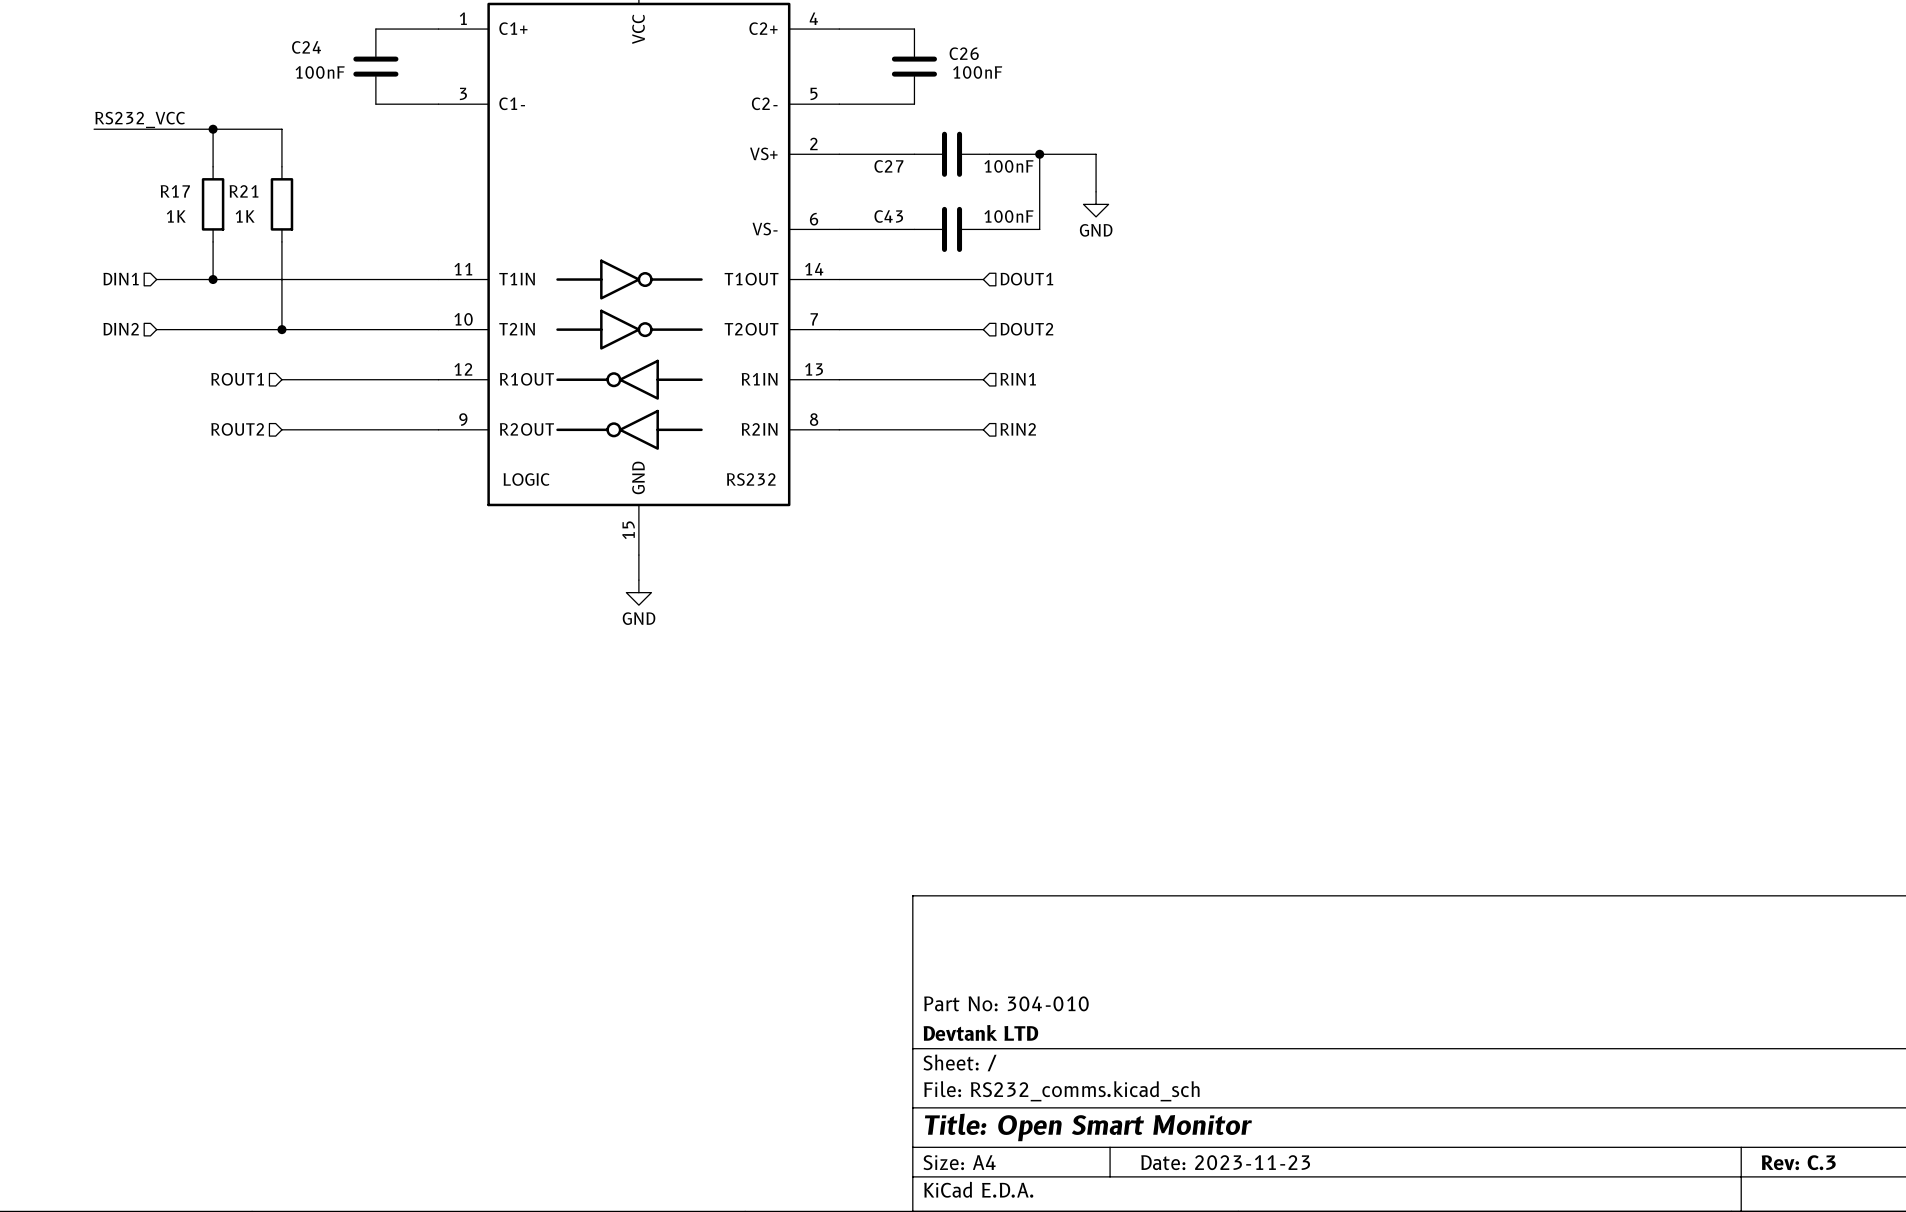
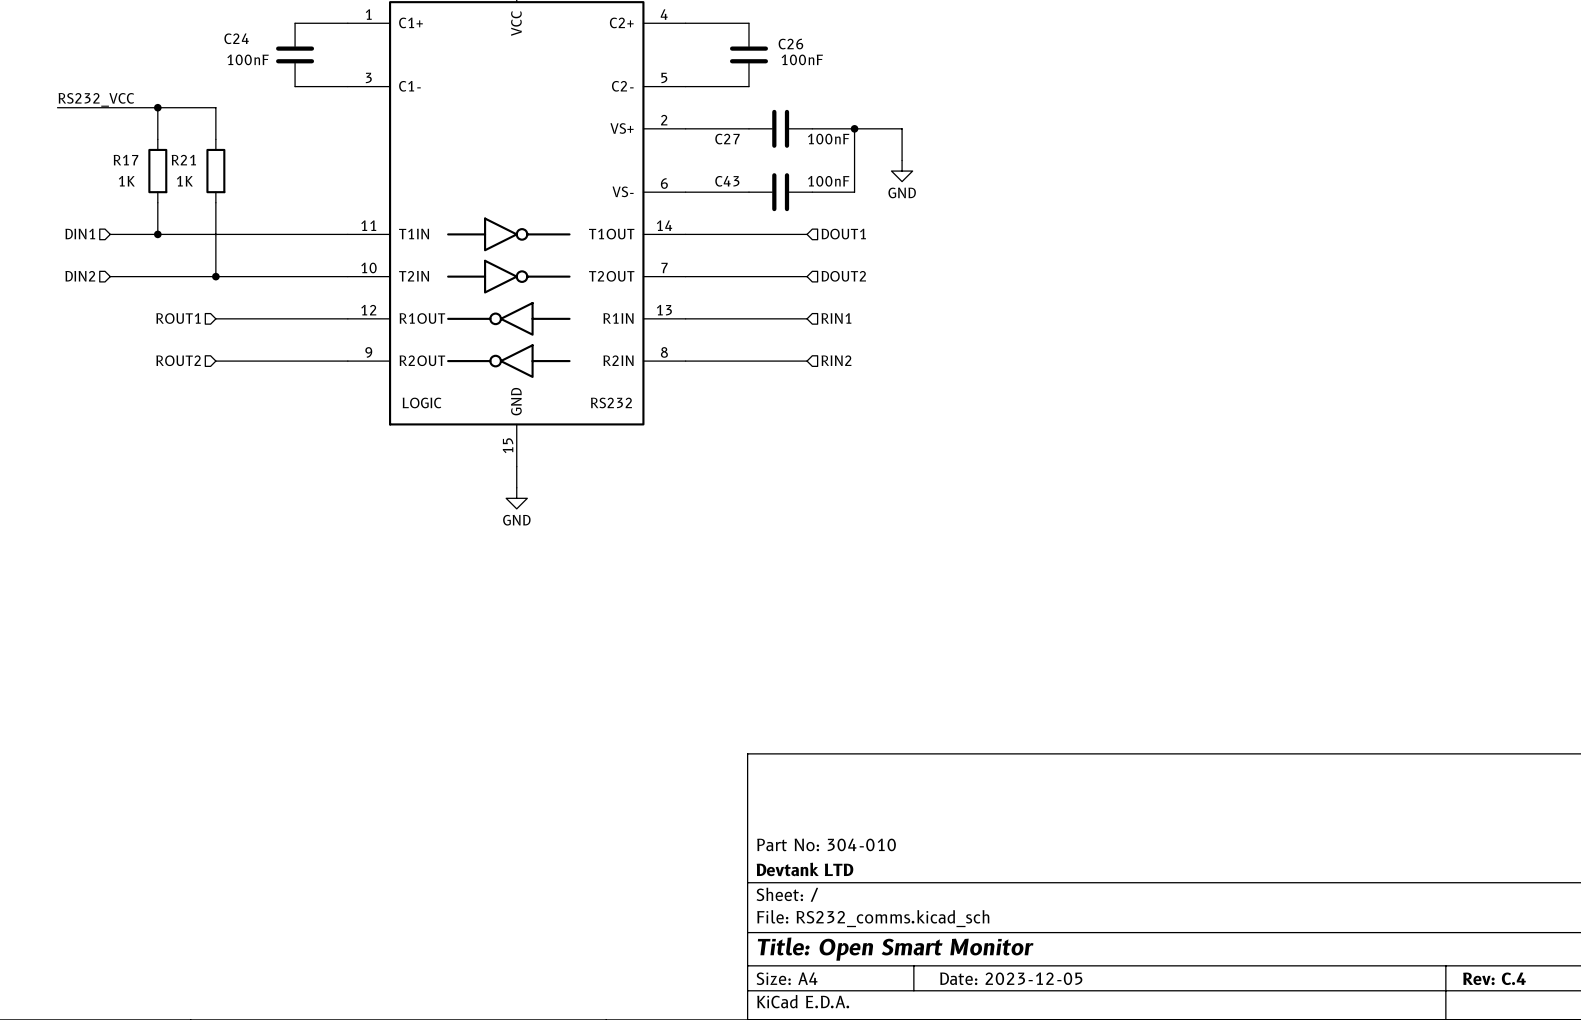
title block: Date: 2023-11-23 (1225, 1162) -> Date: 2023-12-05 (1011, 978)
title block: Rev: C.3 (1798, 1162) -> Rev: C.4 (1494, 978)

